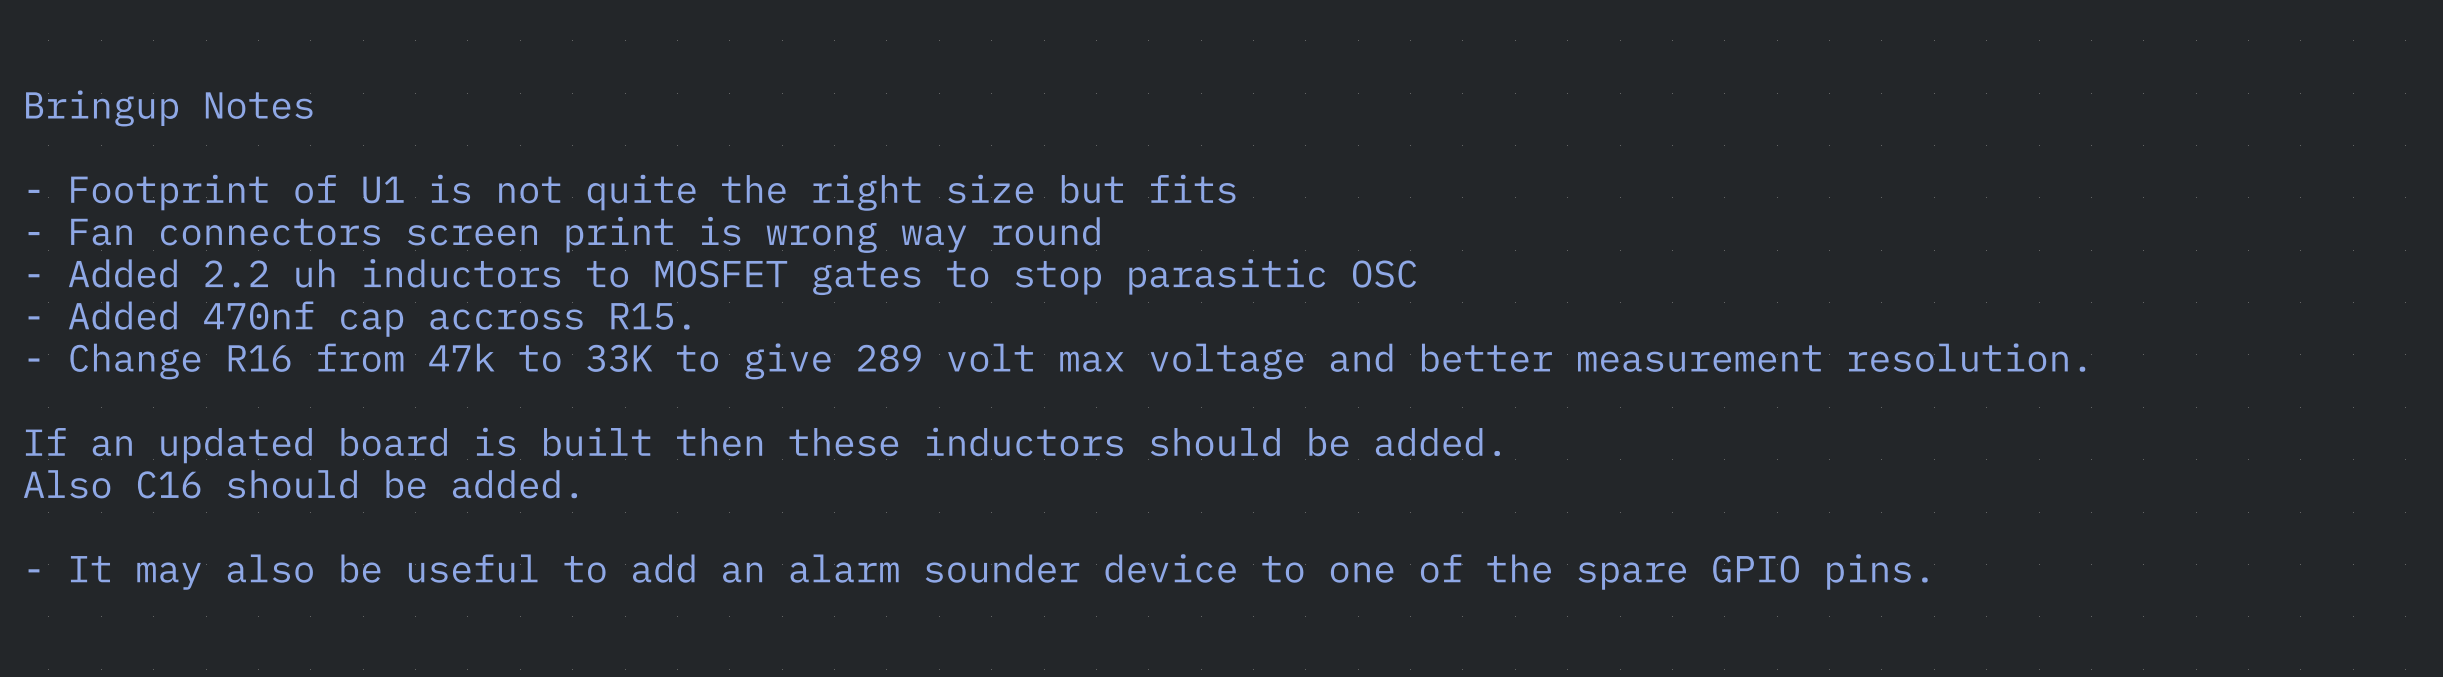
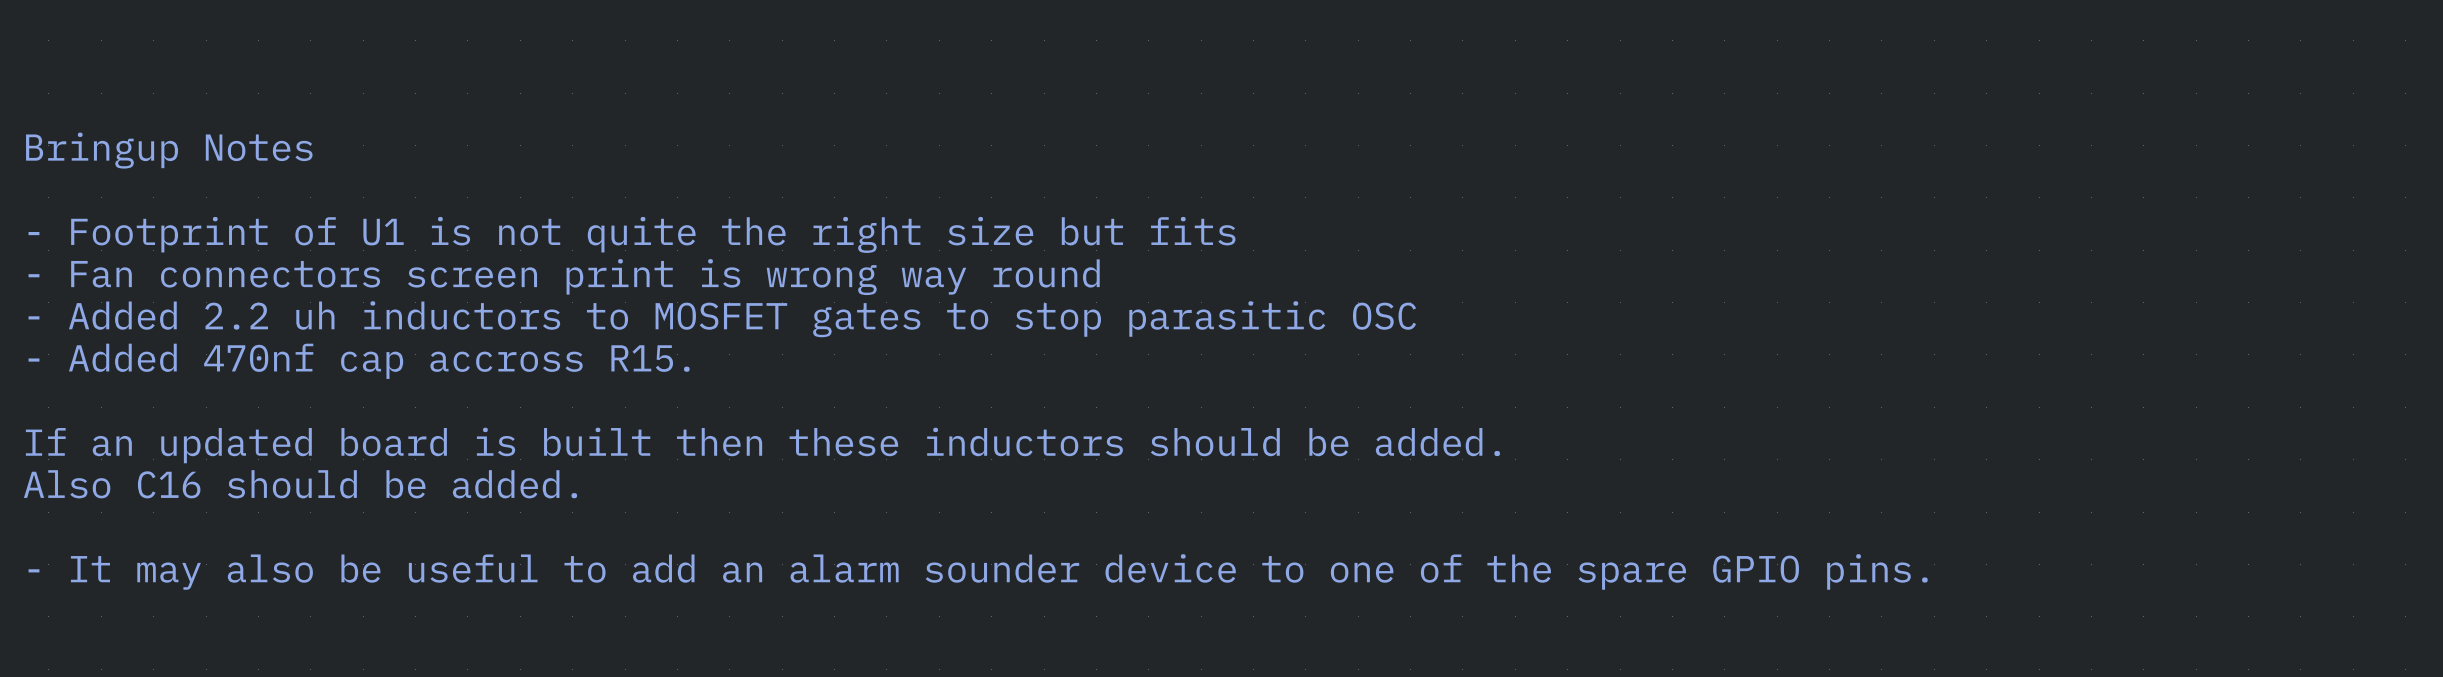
text position: Bringup Notes (169, 108) -> Bringup Notes (169, 150)
text: - Footprint of U1 is not quite the right size but fits (632, 192) -> none
text: - Fan connectors screen print is wrong way round (564, 234) -> - Footprint of U1 is not quite the right size but fits (632, 234)
text: - Added 2.2 uh inductors to MOSFET gates to stop parasitic OSC (722, 277) -> - Fan connectors screen print is wrong way round (564, 277)
text: - Added 470nf cap accross R15. (359, 319) -> - Added 2.2 uh inductors to MOSFET gates to stop parasitic OSC (722, 319)
text: - Change R16 from 47k to 33K to give 289 volt max voltage and better measurement resolution. (1056, 361) -> - Added 470nf cap accross R15. (359, 361)

